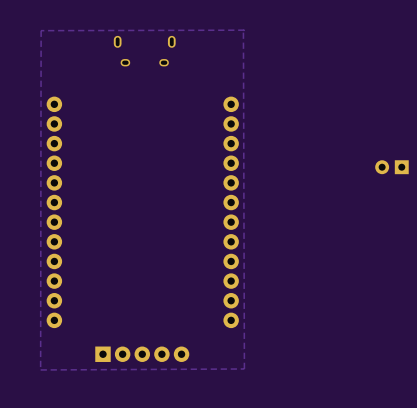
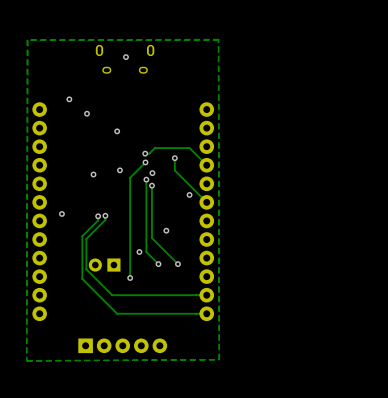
zone outline: none -> (218, 40) (28, 40) (26, 361) (219, 359) (218, 40)
via: none -> (125, 57)
via: none -> (69, 99)
via: none -> (87, 113)
via: none -> (117, 131)
track: none -> (145, 153) (149, 153) (154, 148) (189, 148) (206, 165)
via: none -> (145, 153)
track: none -> (174, 158) (174, 170) (206, 202)
via: none -> (174, 158)
track: none -> (145, 162) (130, 177) (130, 278)
via: none -> (145, 162)
part: (391, 167) -> none
via: none -> (119, 170)
via: none -> (152, 173)
via: none -> (93, 174)
track: none -> (146, 179) (146, 252) (158, 264)
via: none -> (146, 179)
track: none -> (151, 185) (151, 238) (177, 264)
via: none -> (151, 185)
via: none -> (189, 194)
via: none -> (61, 213)
track: none -> (105, 215) (105, 219) (86, 238) (86, 269) (112, 295) (206, 295)
via: none -> (105, 215)
track: none -> (98, 216) (98, 220) (82, 236) (82, 278) (117, 313) (206, 313)
via: none -> (98, 216)
via: none -> (166, 230)
via: none -> (139, 252)
via: none -> (158, 264)
via: none -> (177, 264)
part: none -> (104, 265)
via: none -> (130, 278)

